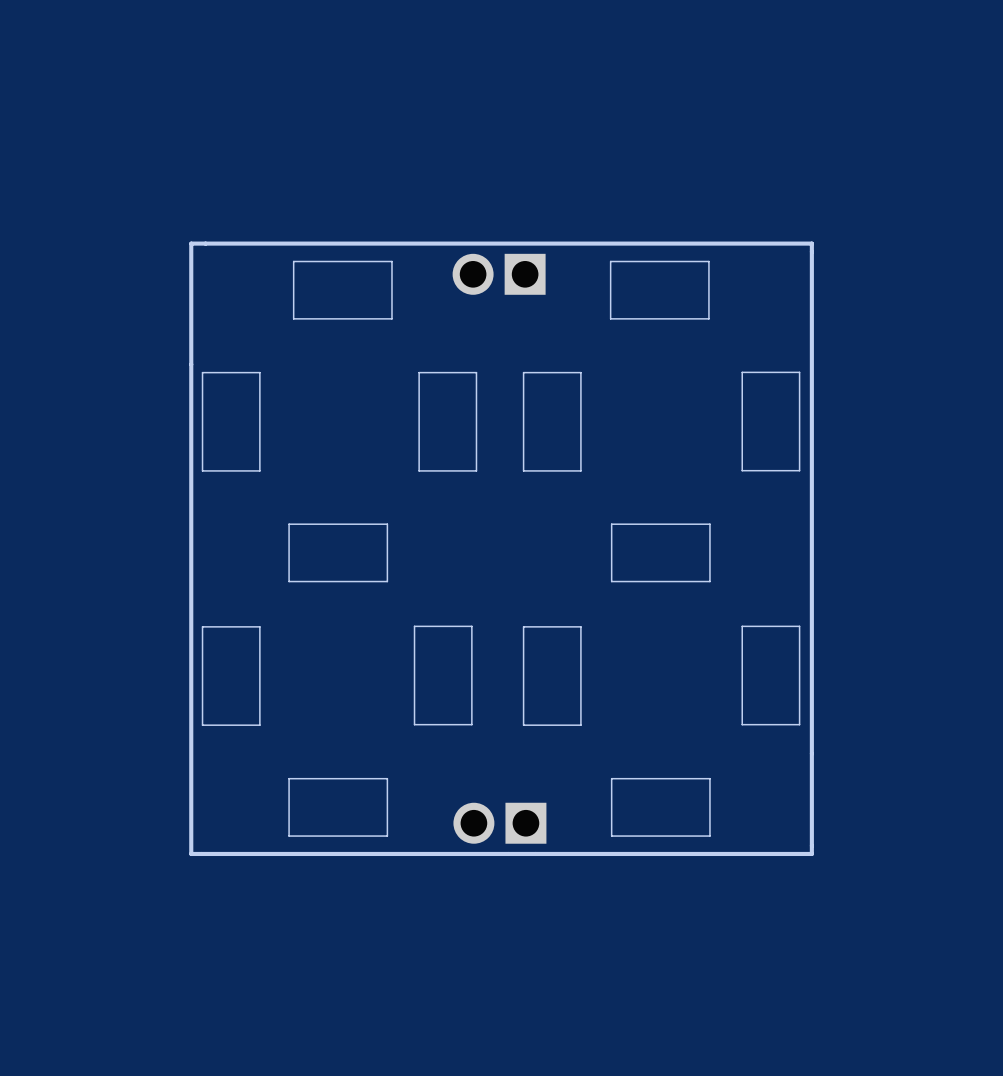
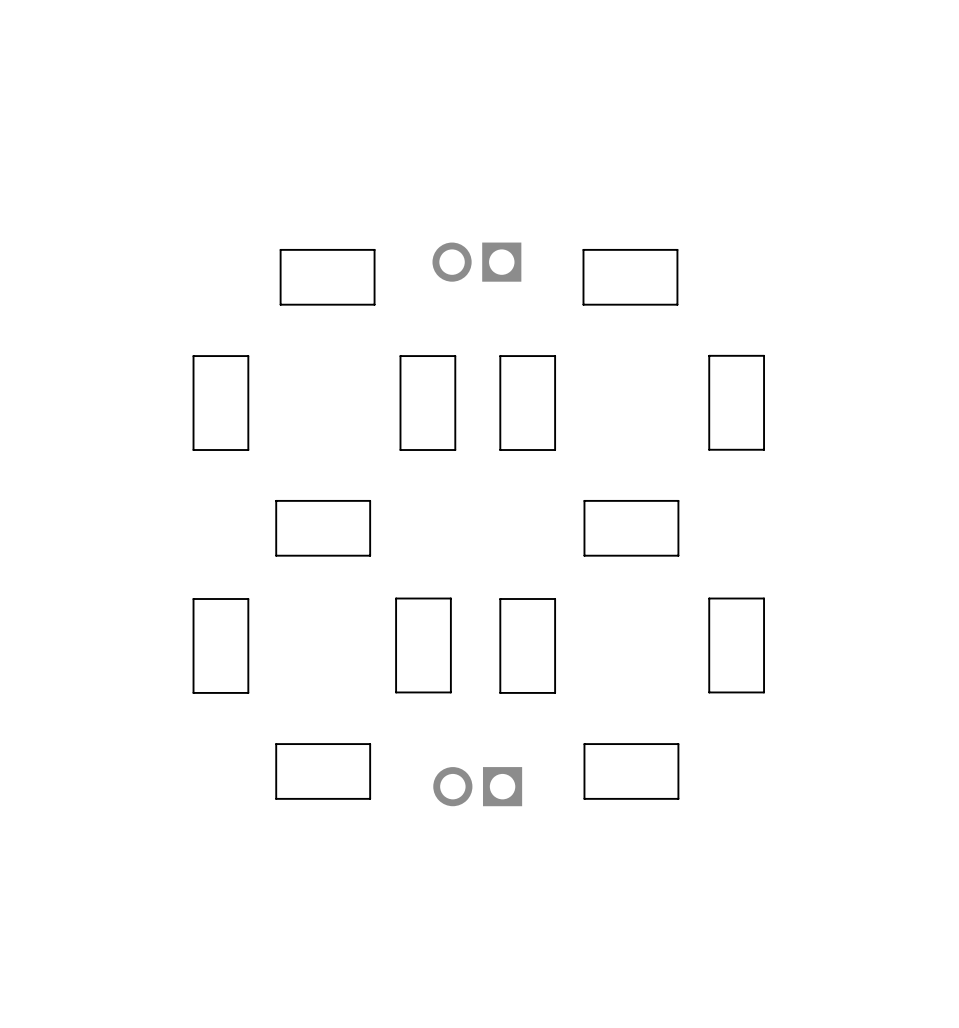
board edge: (811, 243) (811, 853) (191, 853) (191, 243) (811, 243) -> none

